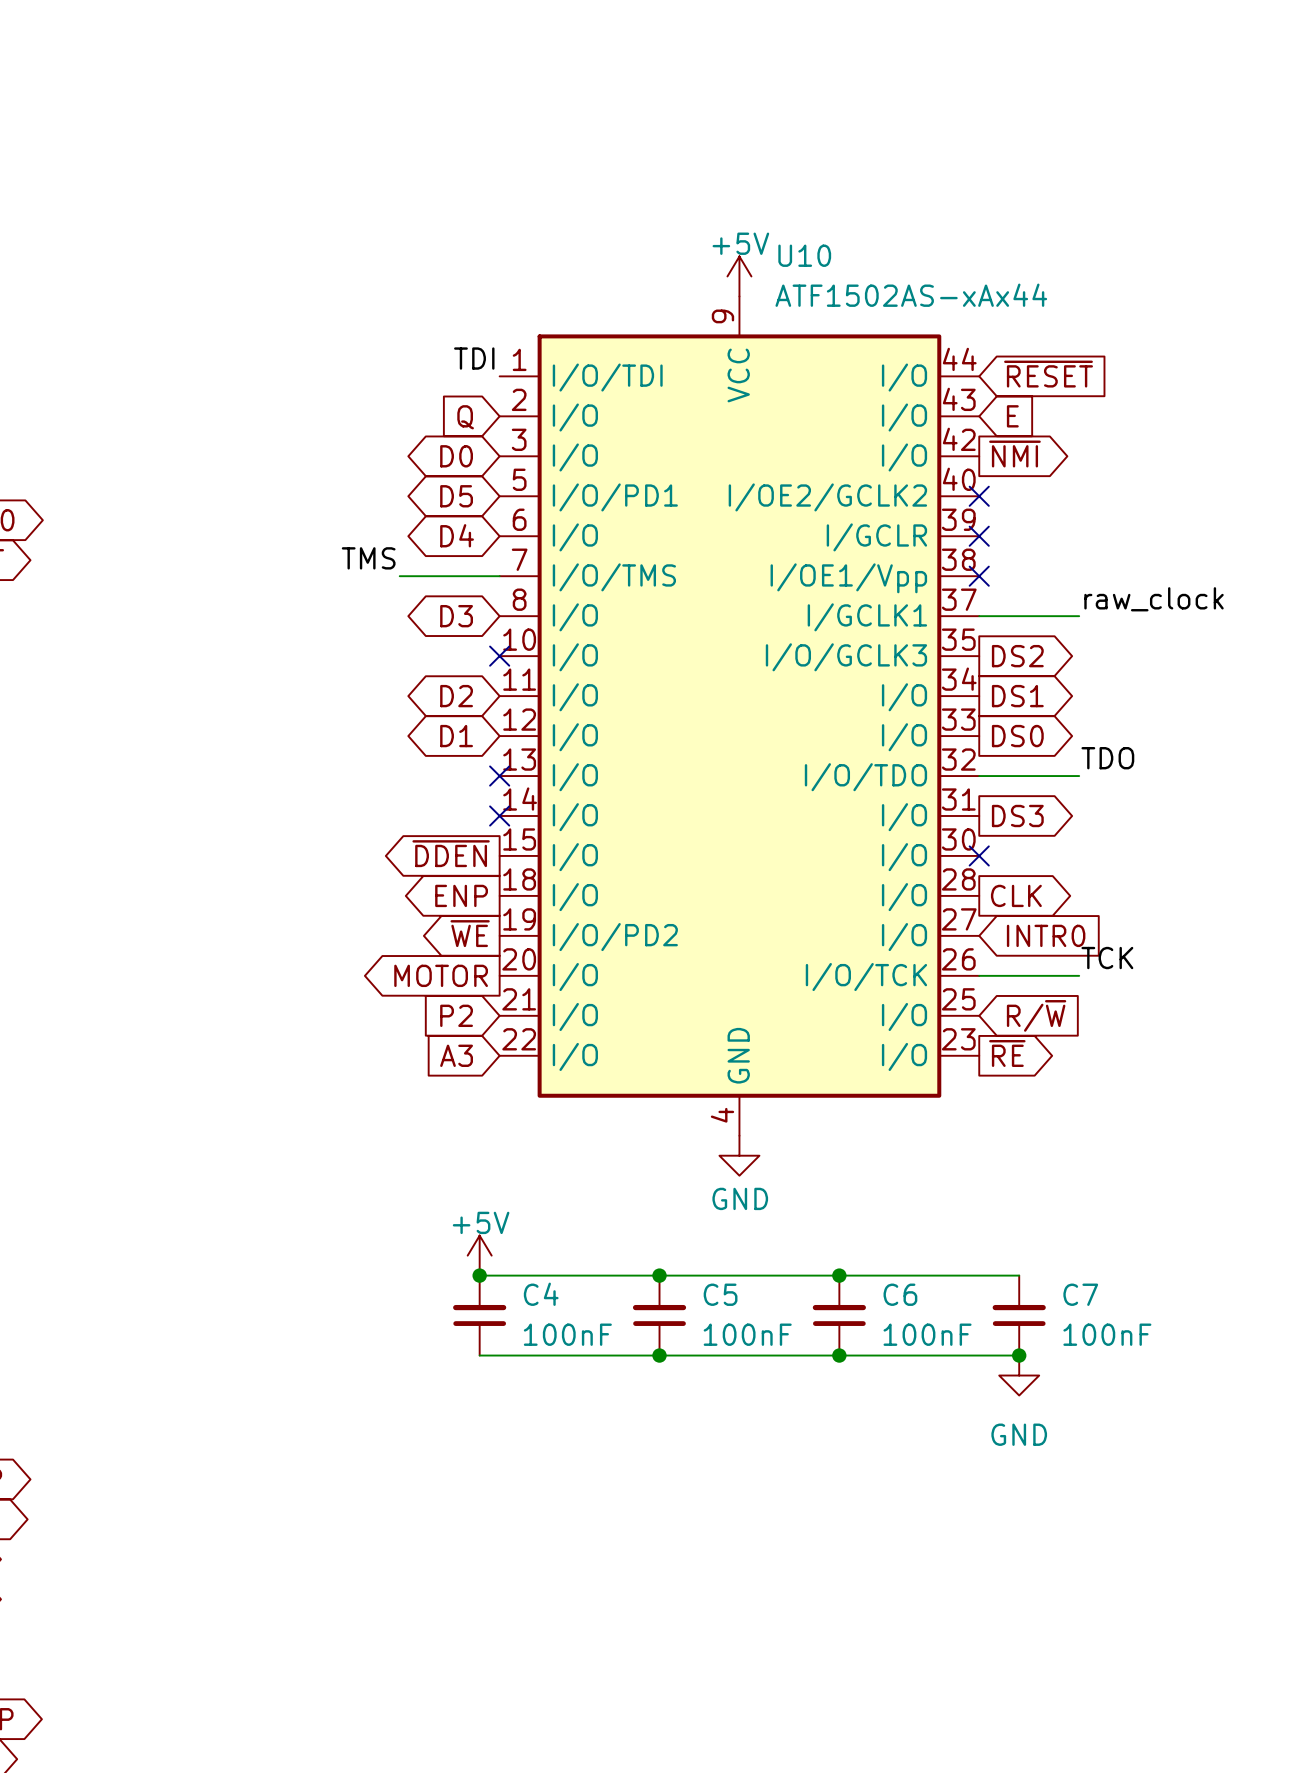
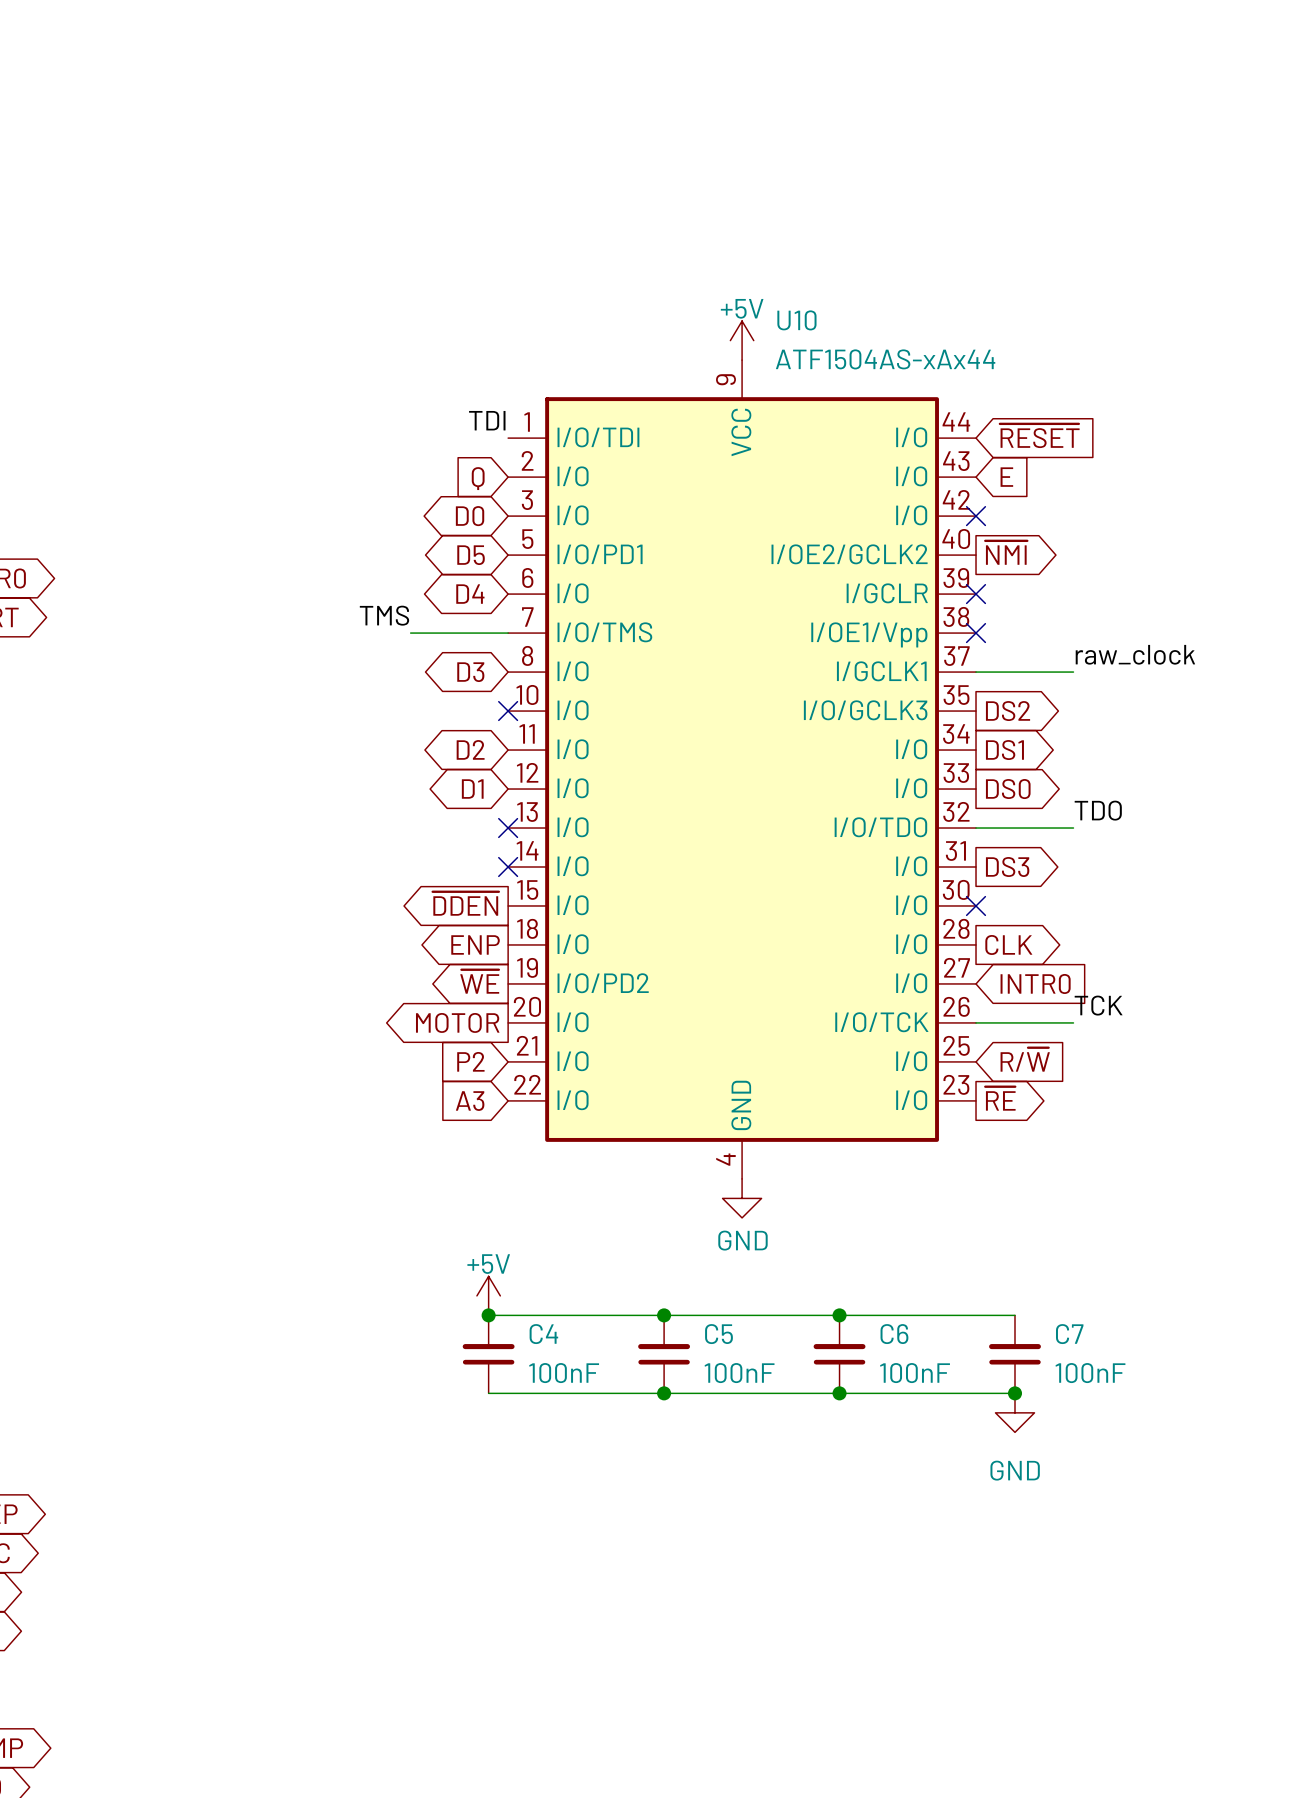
U10 value: ATF1502AS-xAx44 (911, 295) -> ATF1504AS-xAx44 (885, 359)
global label position: ~{NMI} (1014, 454) -> ~{NMI} (1006, 552)
no-connect mark position: (979, 496) -> (976, 516)

